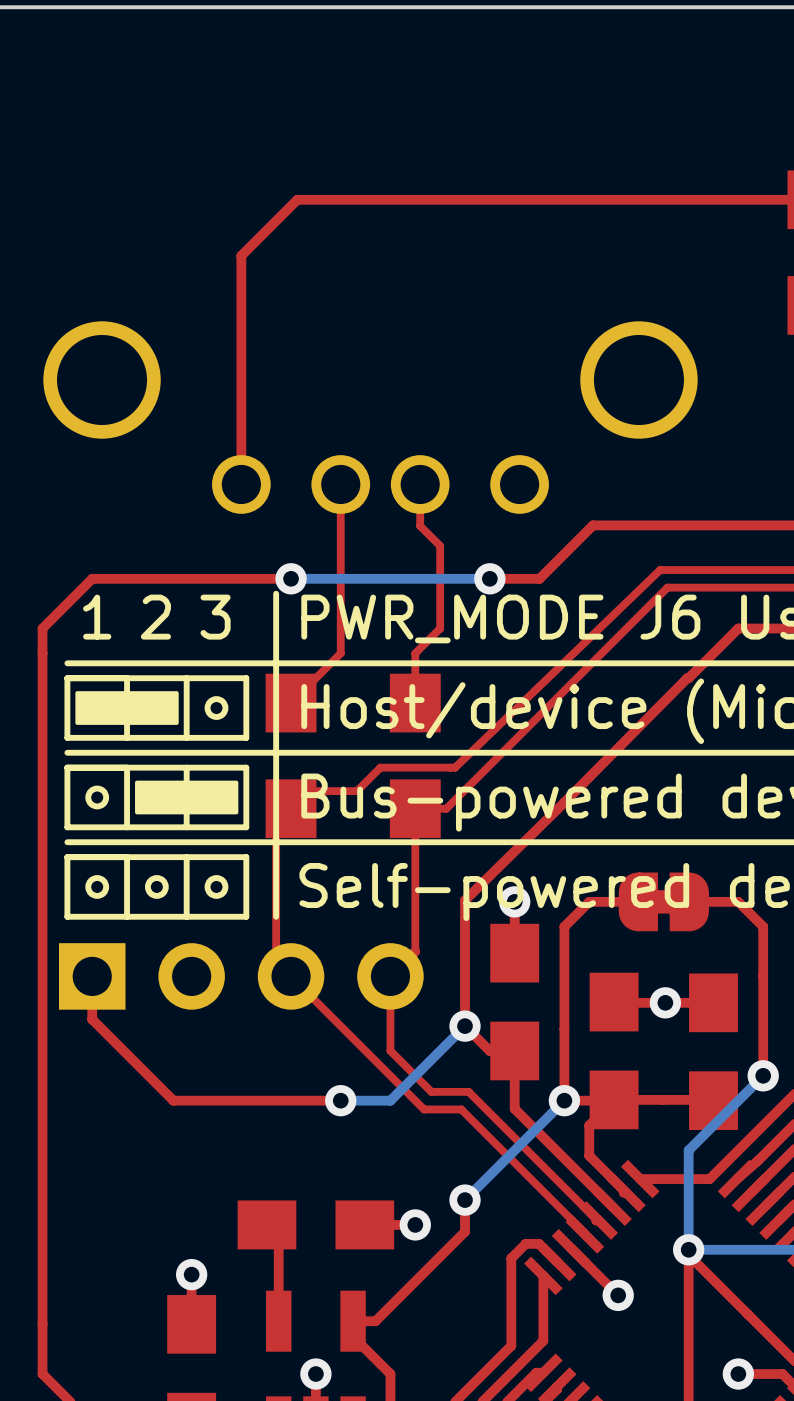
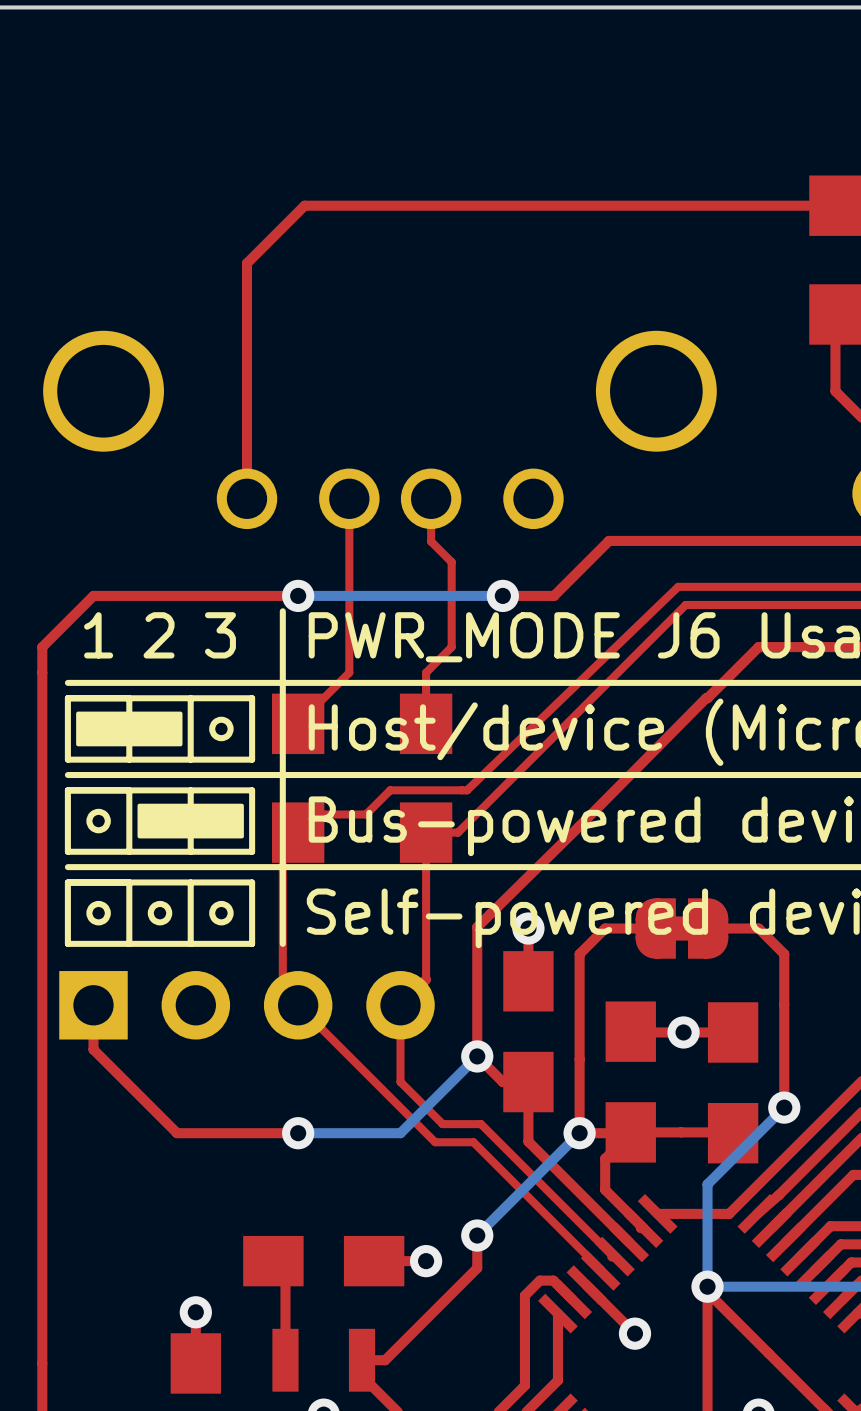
top track: (340, 1100) (291, 1100) -> none
bottom track: none -> (349, 1133) (298, 1133)
via position: (340, 1100) -> (298, 1133)

